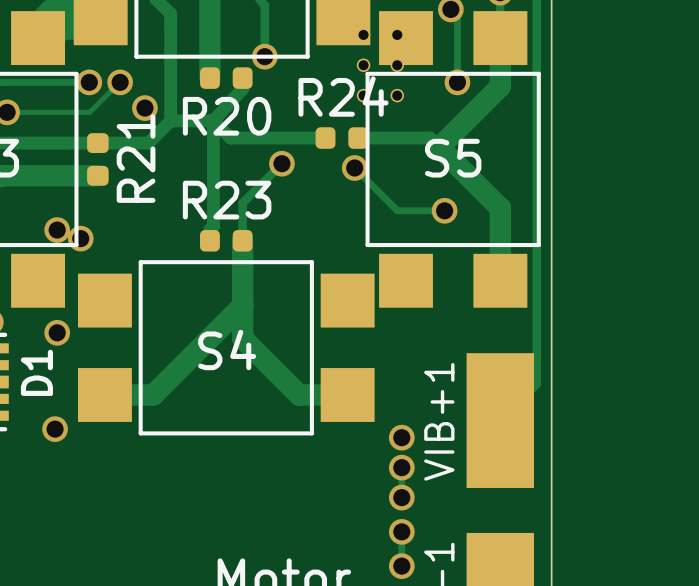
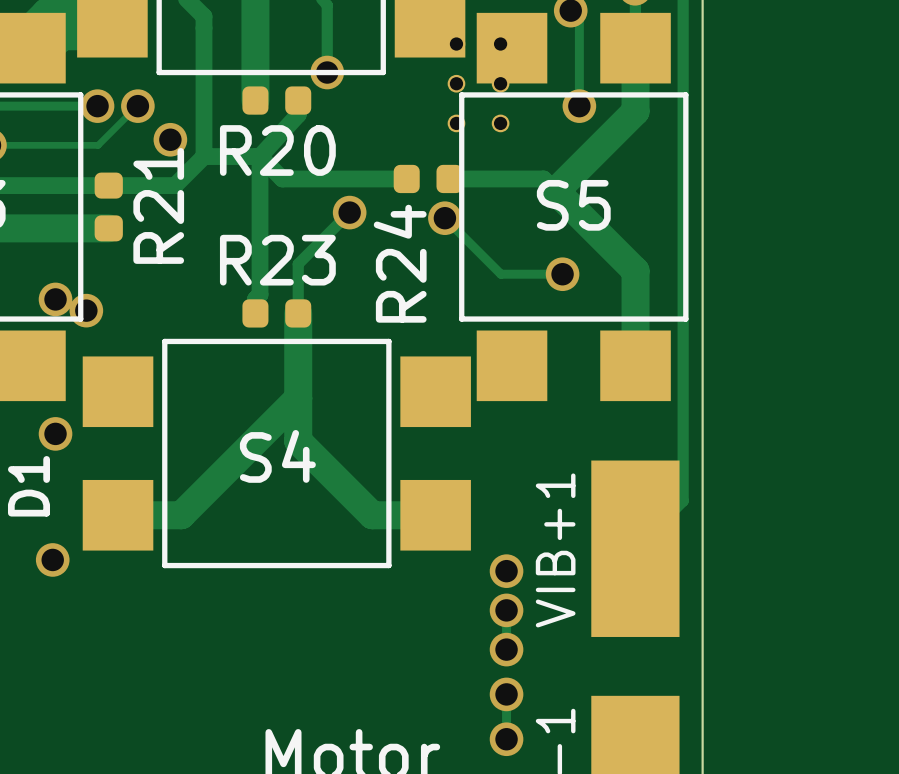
R24 name rotation: 0° (343, 96) -> 90° counterclockwise (400, 263)

